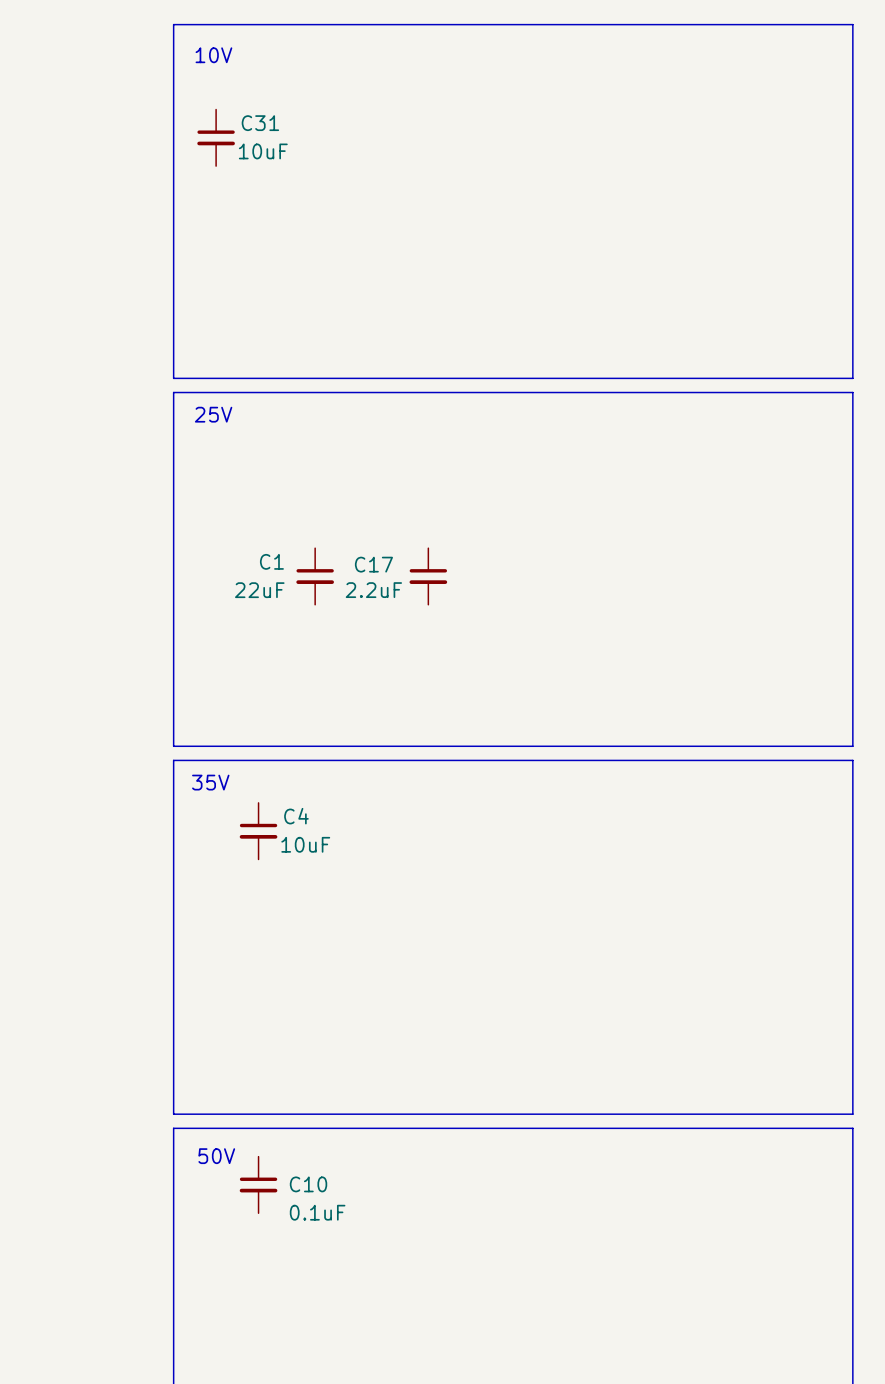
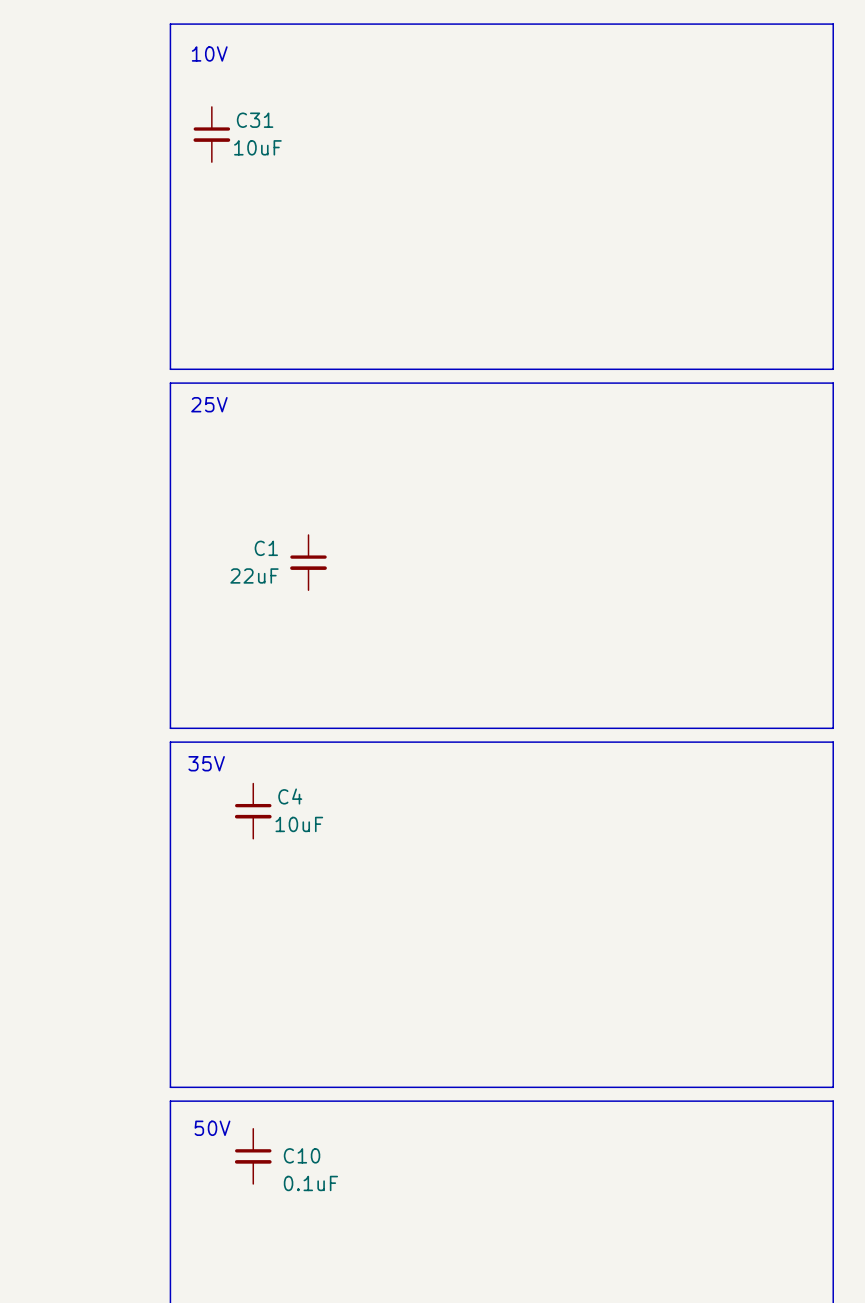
C17: 2.2uF (428, 576) -> none

